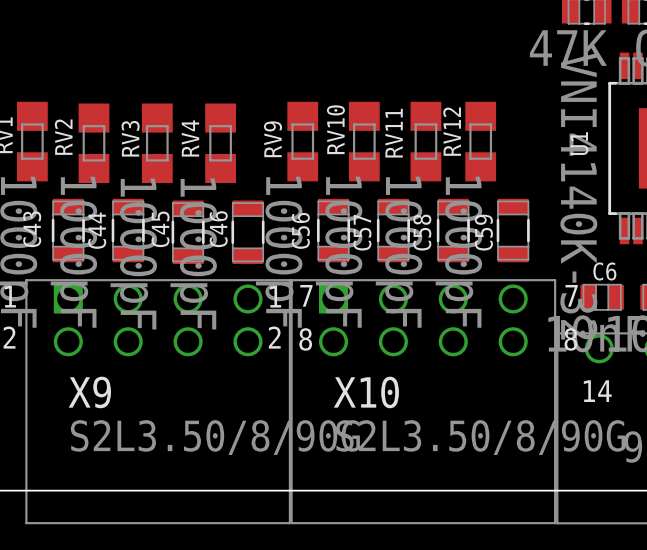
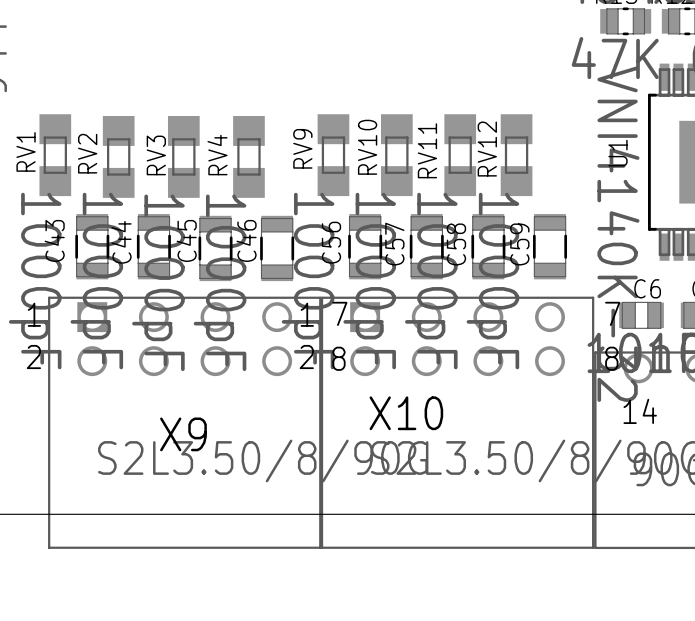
X9 name position: X9 (89, 392) -> X9 (183, 434)

